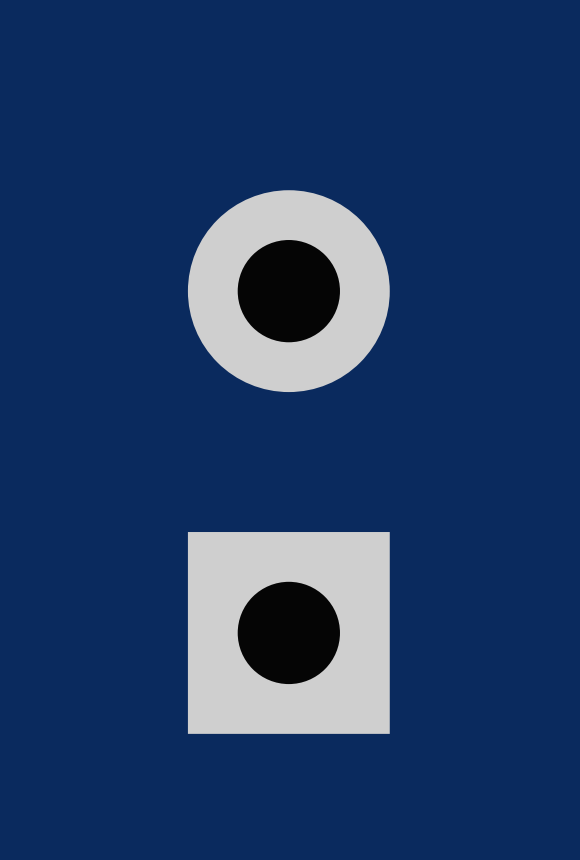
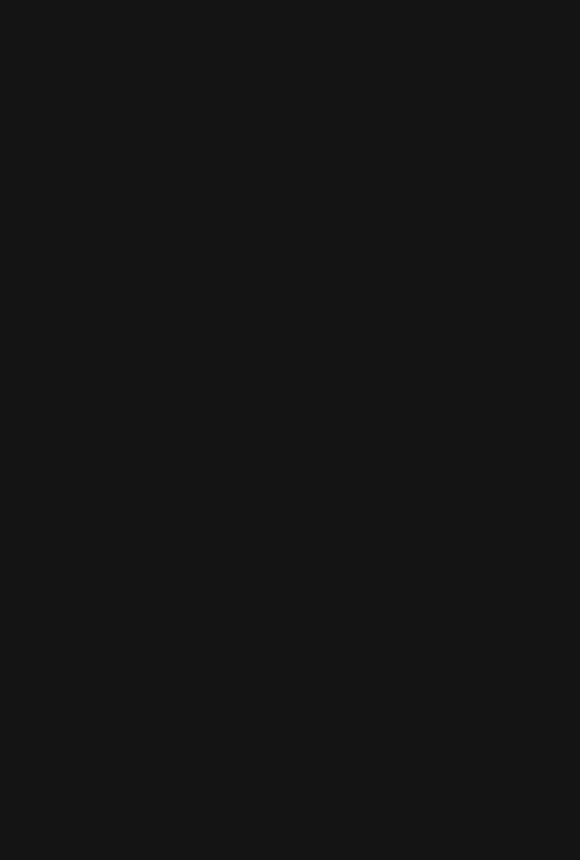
part: (288, 462) -> none

